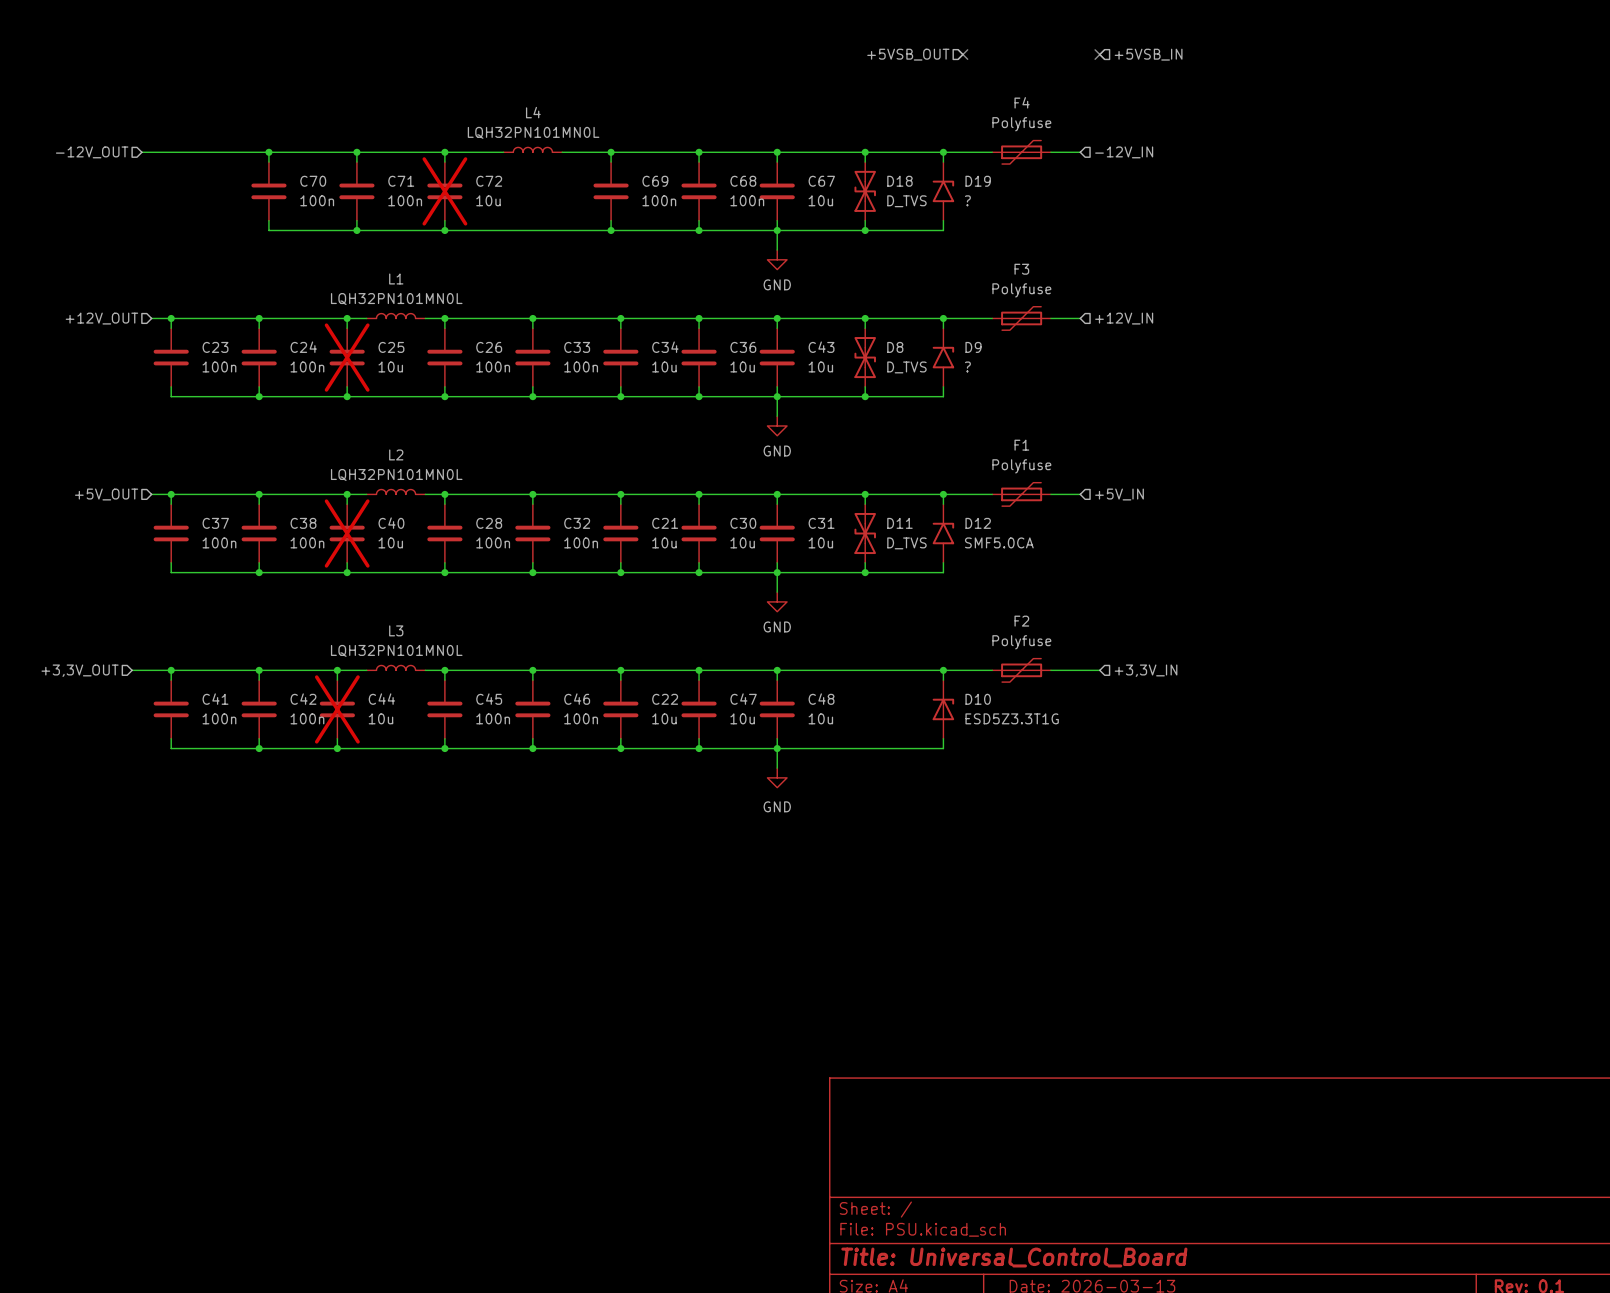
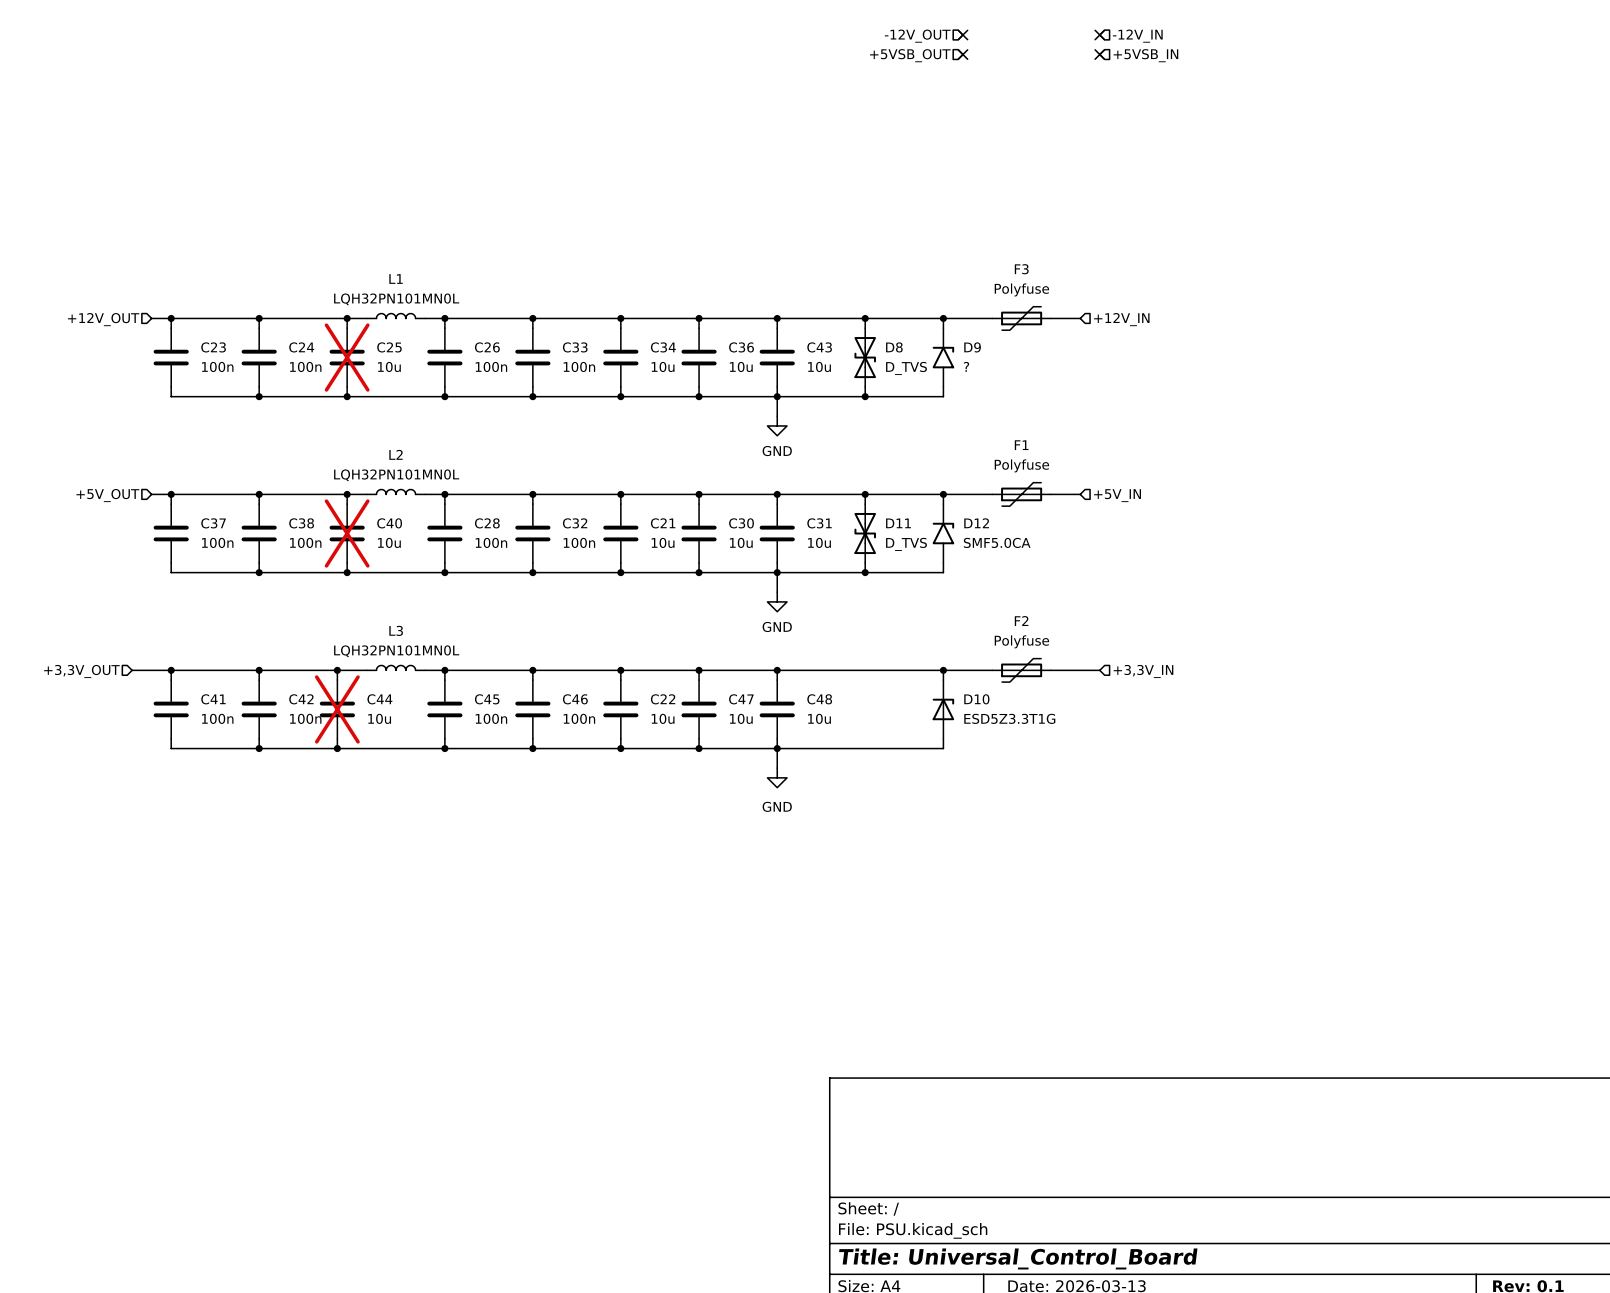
no-connect mark: none -> (962, 34)
no-connect mark: none -> (1099, 34)
hierarchical label: none -> -12V_OUT (917, 36)
L4: LQH32PN101MN0L (532, 149) -> none
hierarchical label: -12V_OUT (92, 152) -> none
wire: (141, 152) (503, 152) -> none
wire: (268, 152) (268, 162) -> none
junction: (268, 152) -> none
wire: (356, 152) (356, 162) -> none
junction: (356, 152) -> none
wire: (444, 152) (444, 162) -> none
junction: (444, 152) -> none
wire: (562, 152) (992, 152) -> none
wire: (611, 152) (611, 162) -> none
junction: (611, 152) -> none
wire: (699, 152) (699, 162) -> none
junction: (699, 152) -> none
wire: (777, 152) (777, 162) -> none
junction: (777, 152) -> none
wire: (865, 152) (865, 162) -> none
junction: (865, 152) -> none
wire: (943, 152) (943, 162) -> none
junction: (943, 152) -> none
F4: Polyfuse (1021, 152) -> none
wire: (1050, 152) (1080, 152) -> none
hierarchical label position: -12V_IN (1124, 152) -> -12V_IN (1137, 36)
C70: 100n (268, 191) -> none
C71: 100n (356, 191) -> none
C72: 10u (444, 191) -> none
C69: 100n (611, 191) -> none
C68: 100n (699, 191) -> none
C67: 10u (777, 191) -> none
D18: D_TVS (865, 191) -> none
D19: ? (943, 191) -> none
wire: (268, 220) (268, 230) (943, 230) (943, 220) -> none
wire: (356, 220) (356, 230) -> none
wire: (444, 220) (444, 230) -> none
wire: (611, 220) (611, 230) -> none
wire: (699, 220) (699, 230) -> none
wire: (777, 220) (777, 250) -> none
wire: (865, 220) (865, 230) -> none
junction: (356, 230) -> none
junction: (444, 230) -> none
junction: (611, 230) -> none
junction: (699, 230) -> none
junction: (777, 230) -> none
junction: (865, 230) -> none
power symbol: GND (777, 259) -> none

